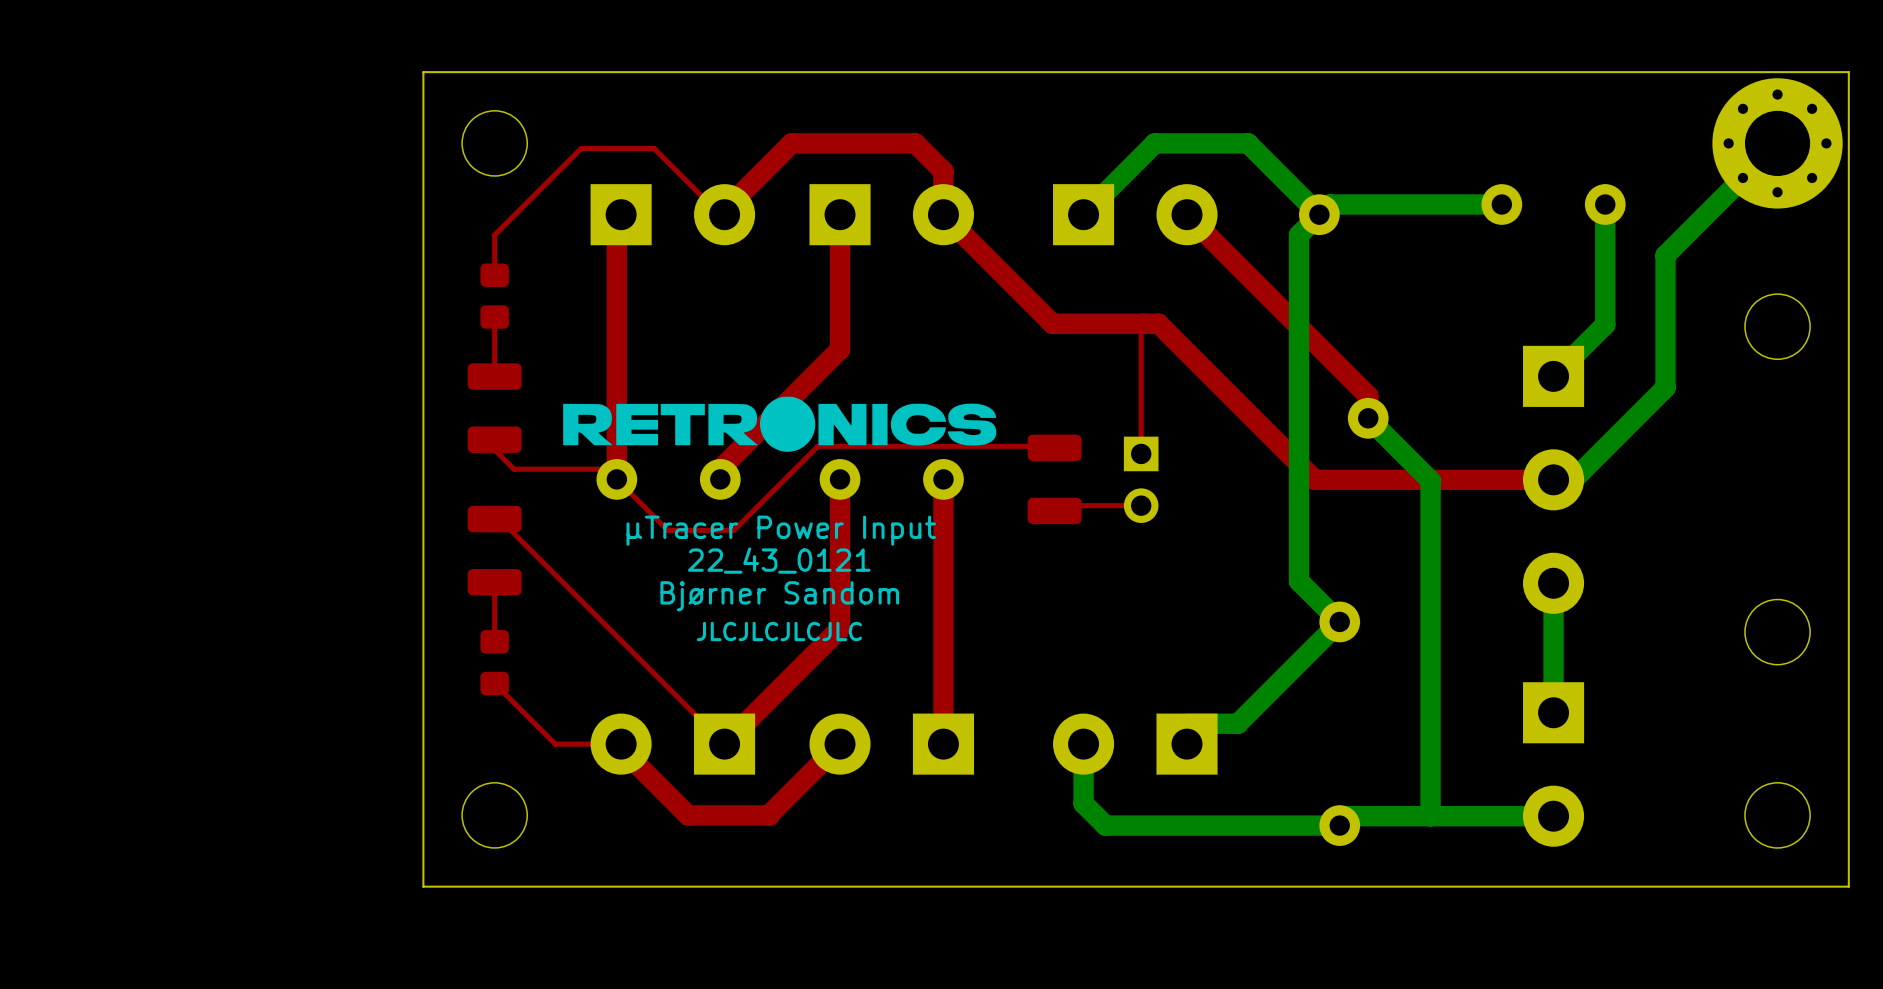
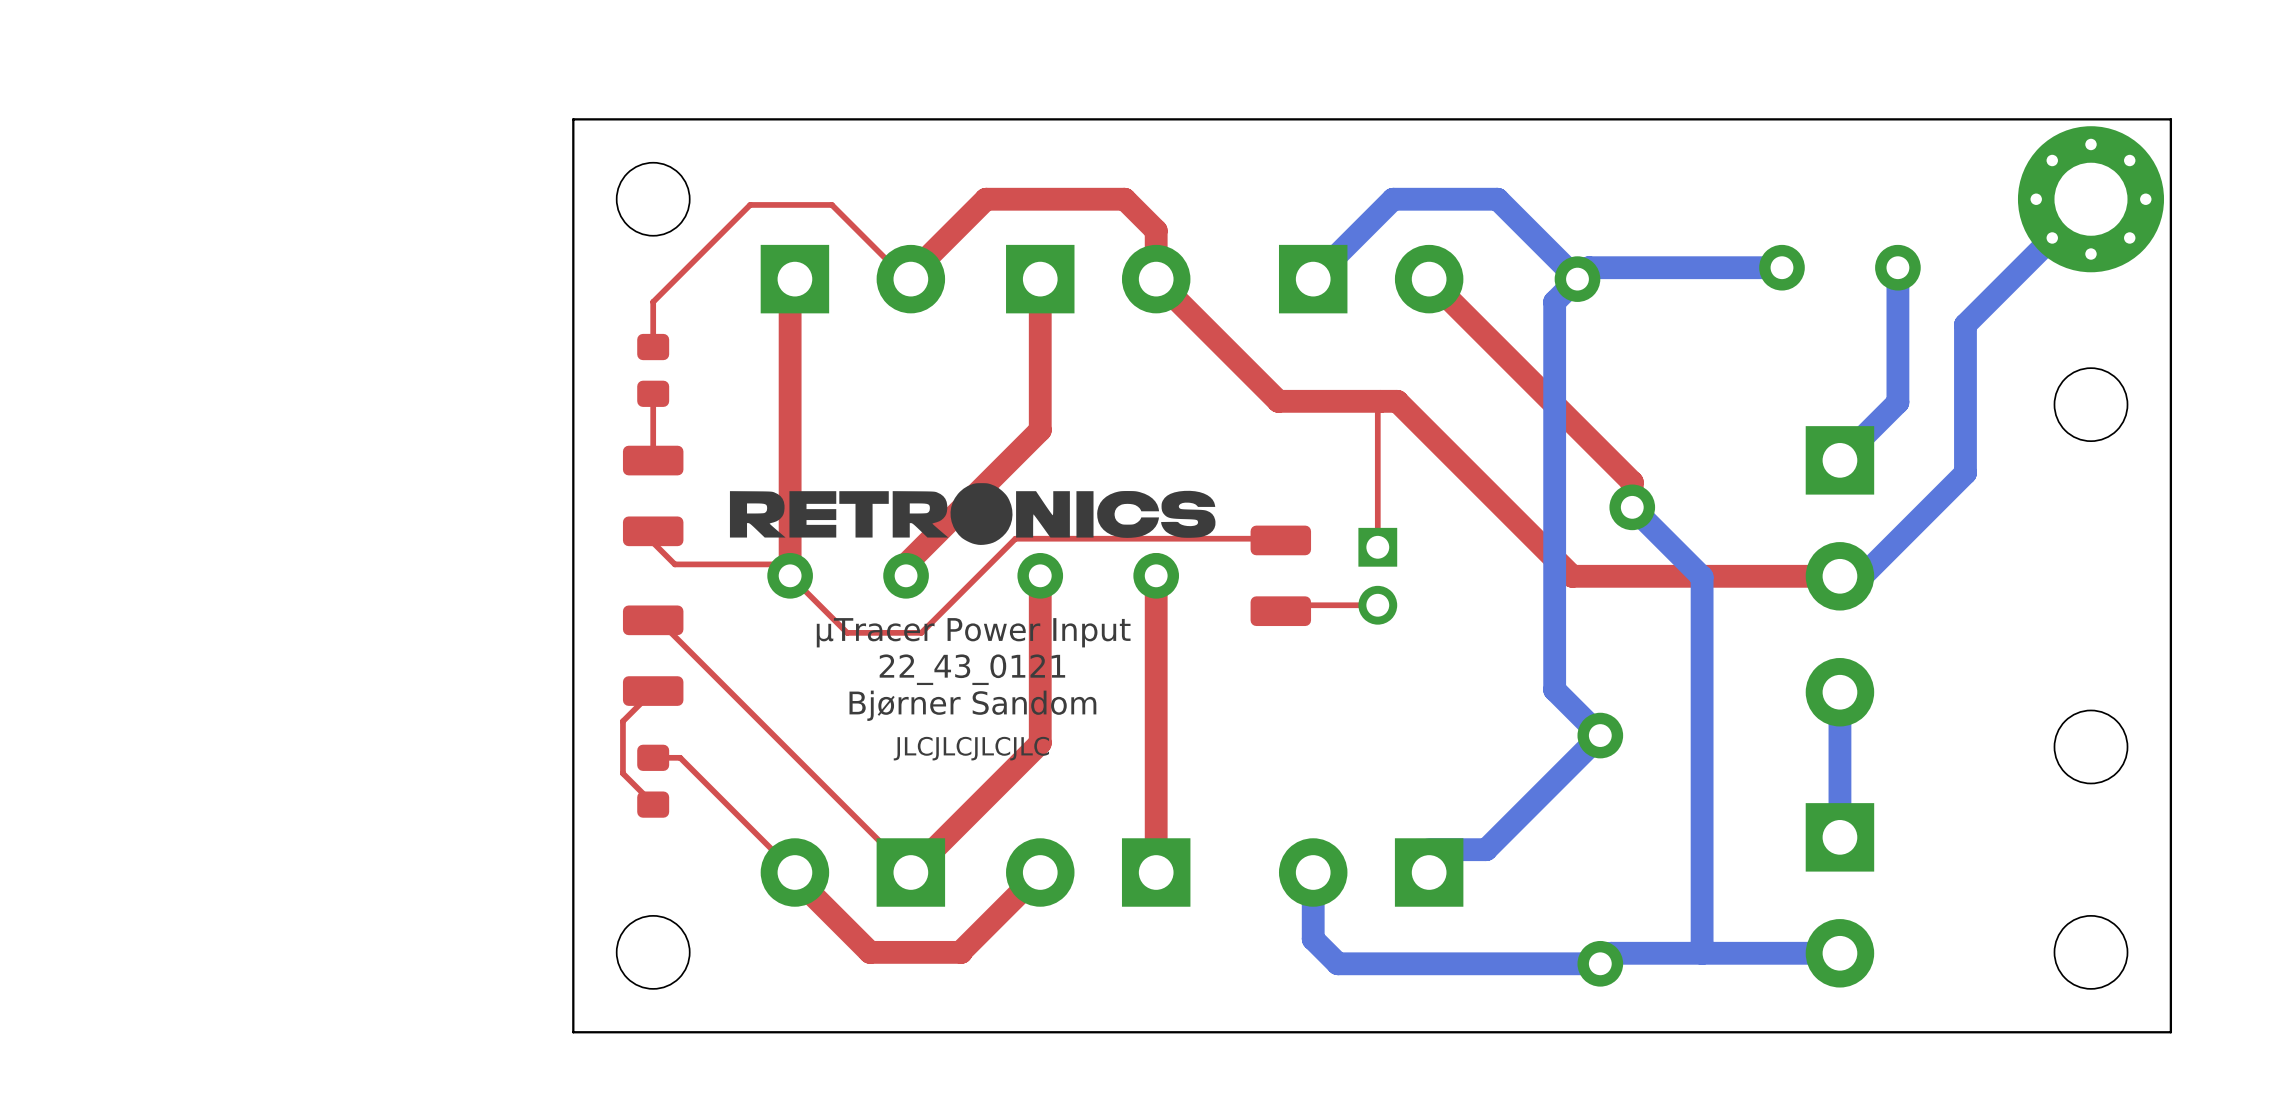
top track: (494, 582) (494, 641) -> (653, 691) (622, 721) (622, 773) (653, 804)
top track: none -> (653, 757) (680, 757) (794, 872)
top track: (494, 683) (555, 744) (616, 744) -> none

